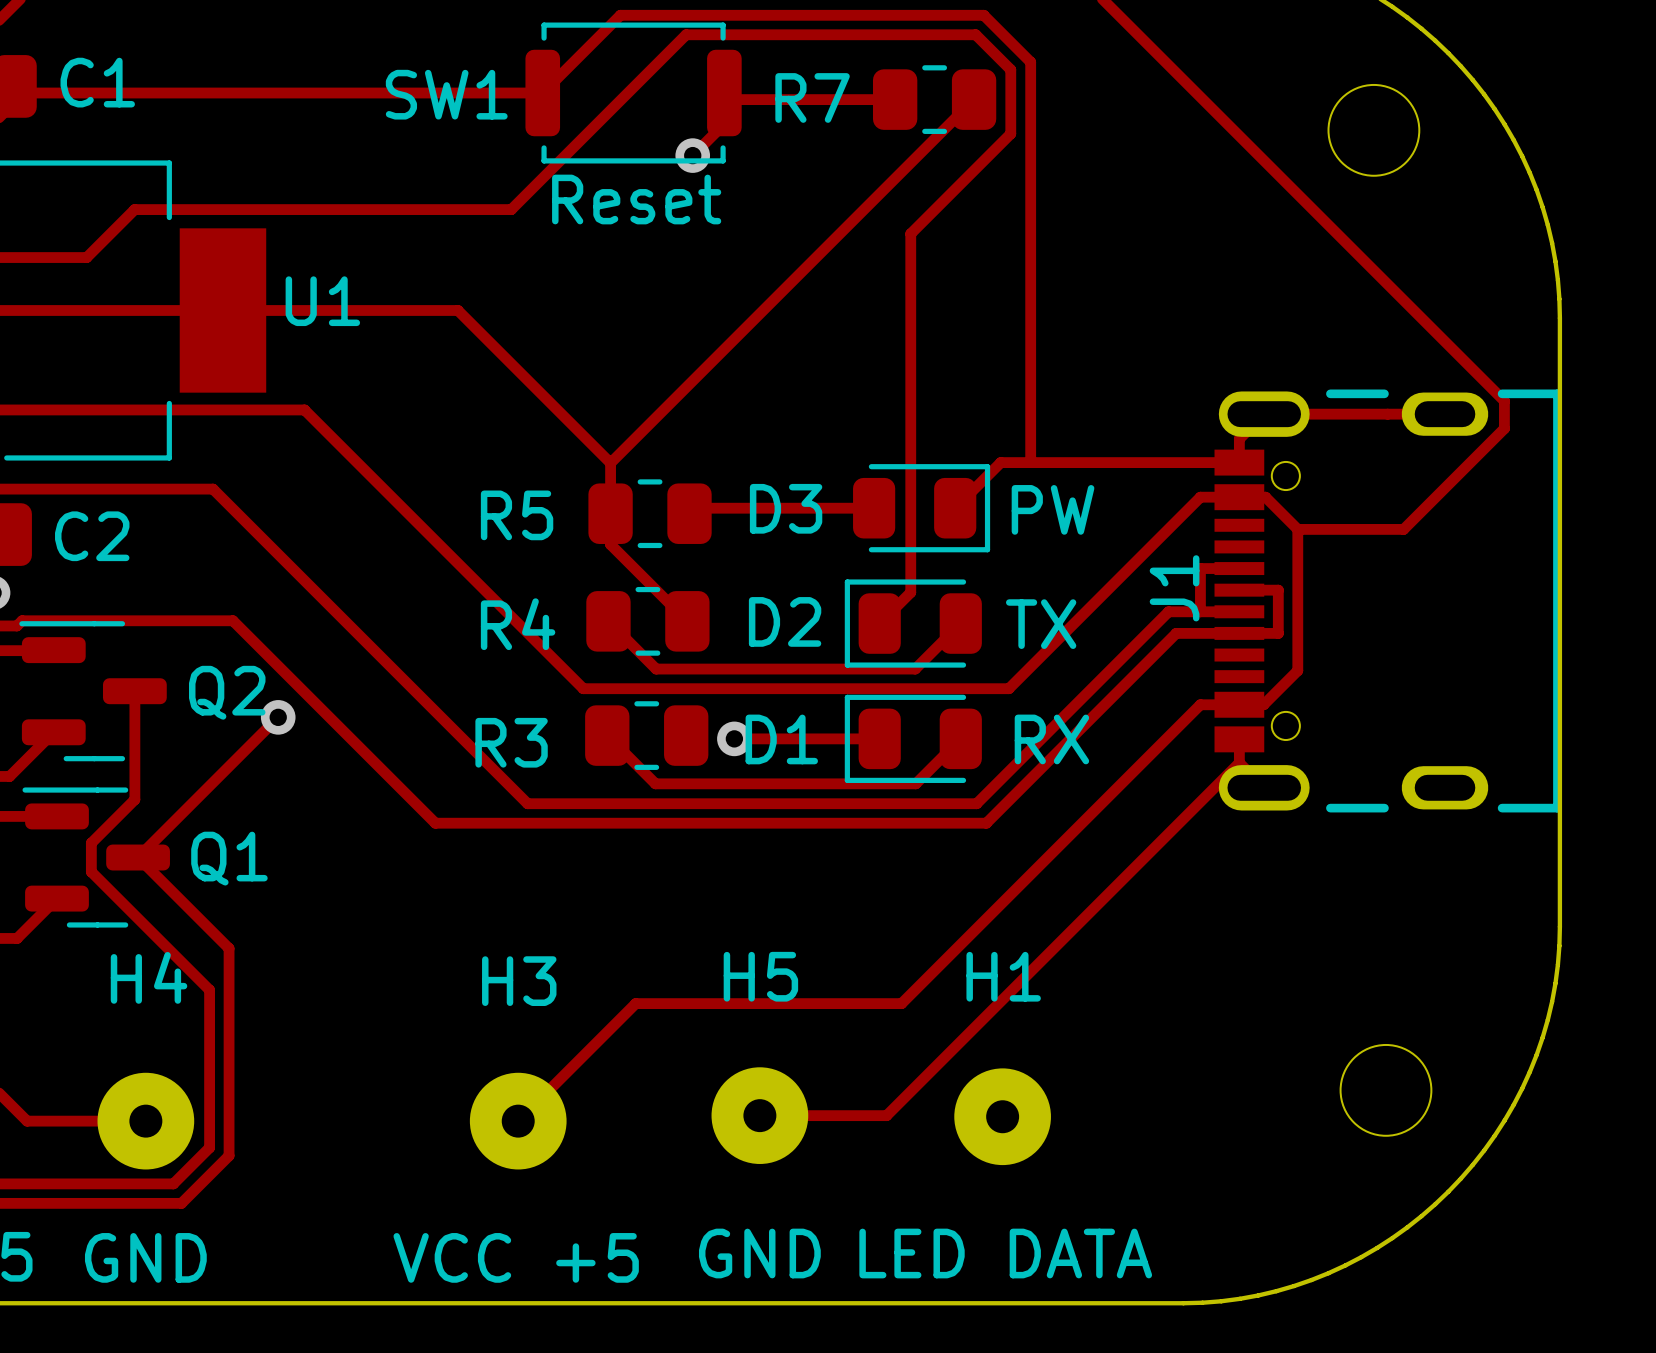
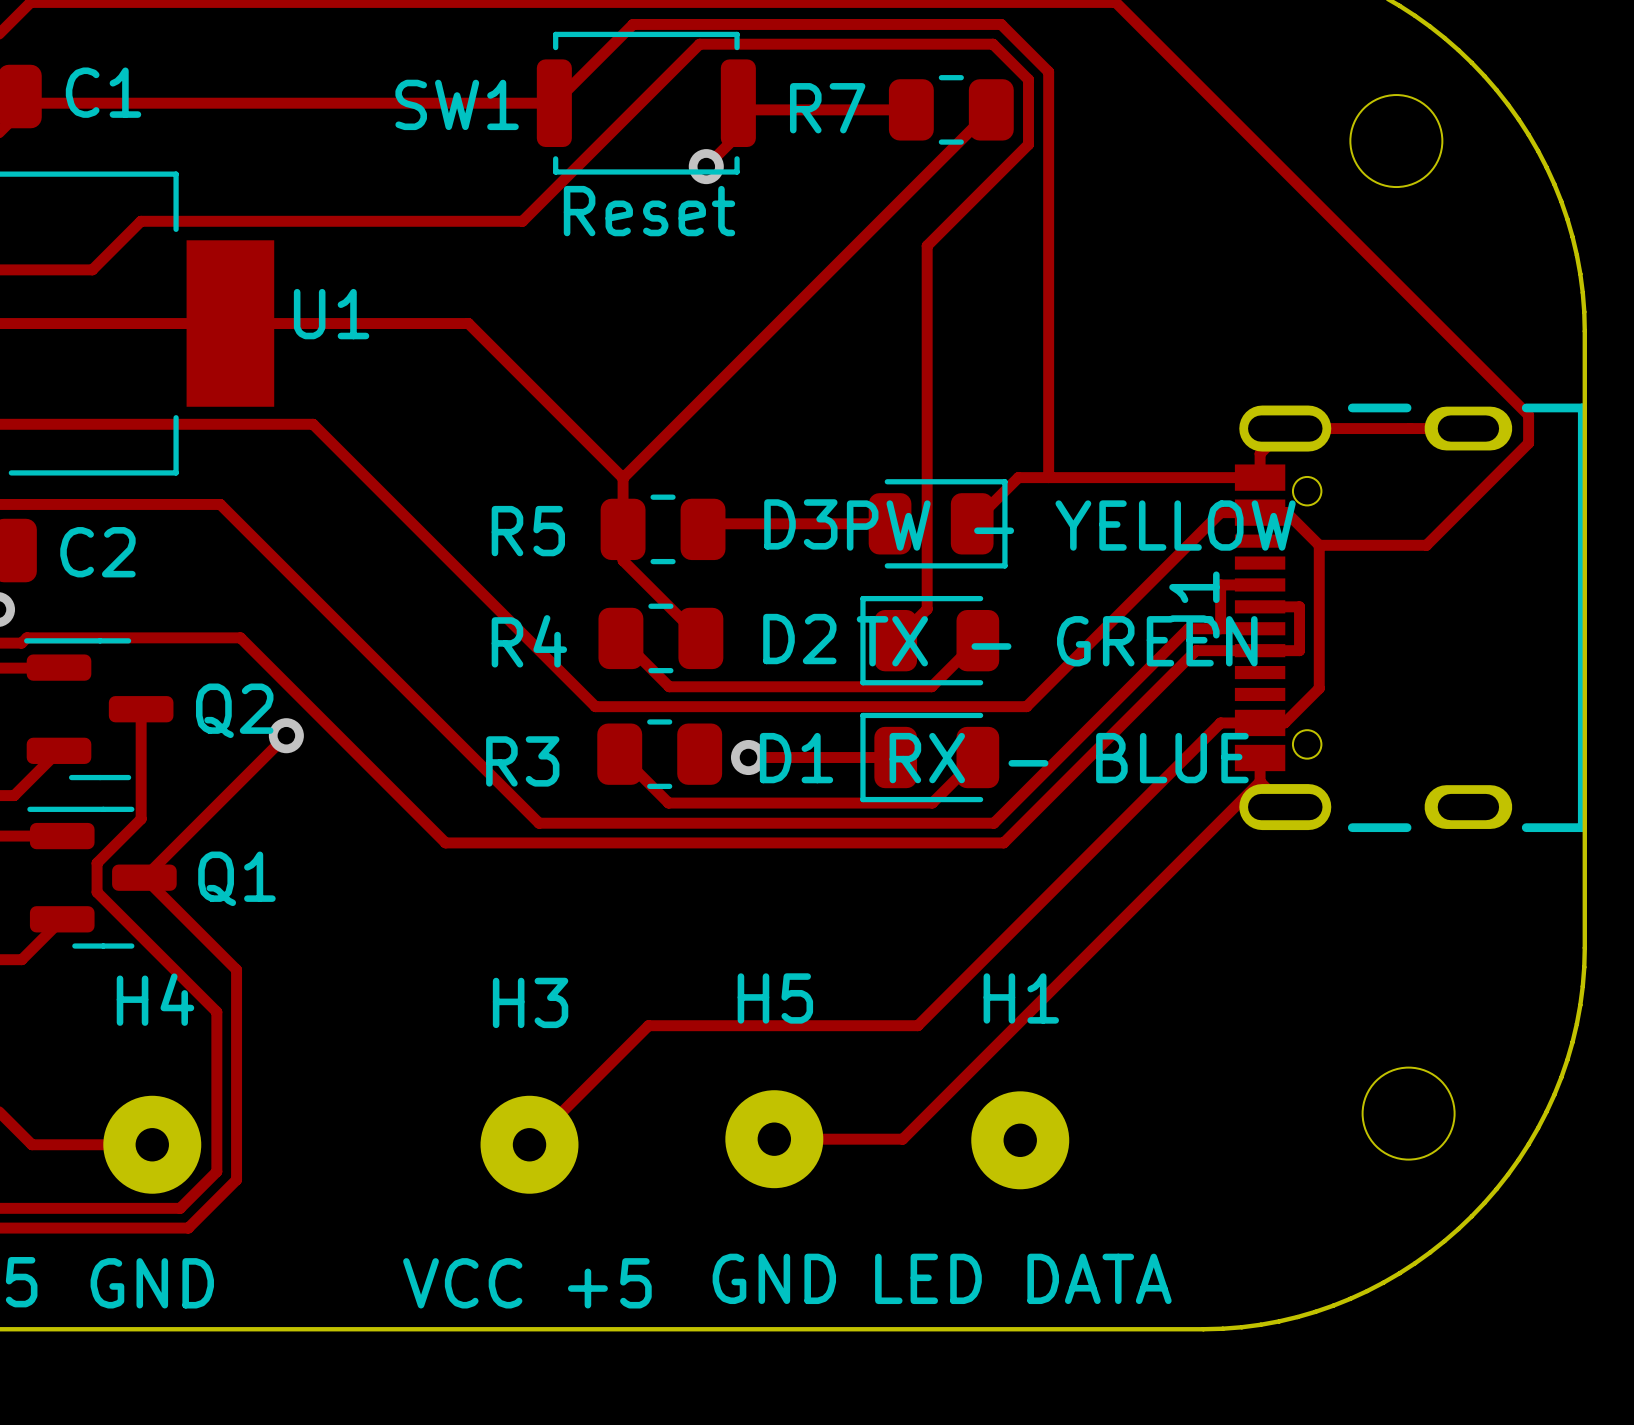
D3 value: PW (1053, 509) -> PW - YELLOW (1071, 525)
D2 value: TX (1041, 624) -> TX - GREEN (1057, 641)
D1 value: RX (1051, 739) -> RX - BLUE (1069, 758)

